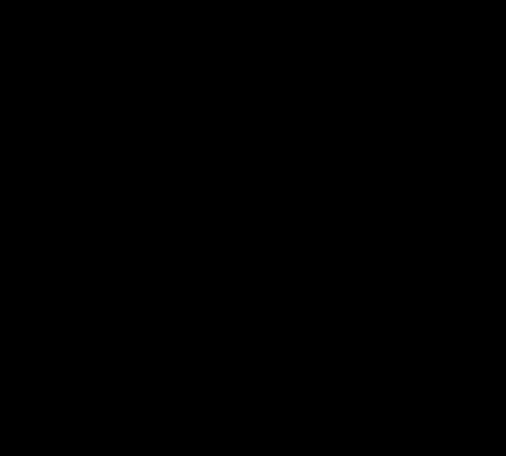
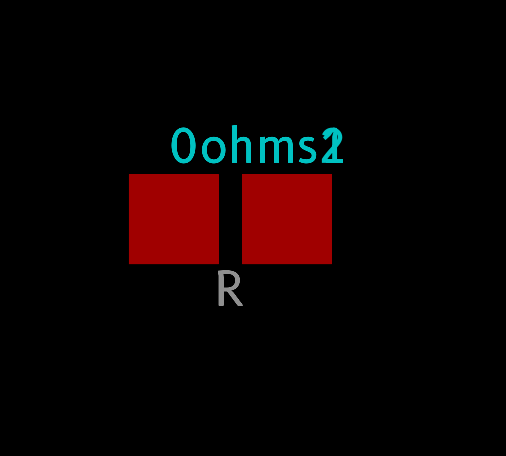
part: none -> R (230, 219)
part: none -> R (230, 219)

